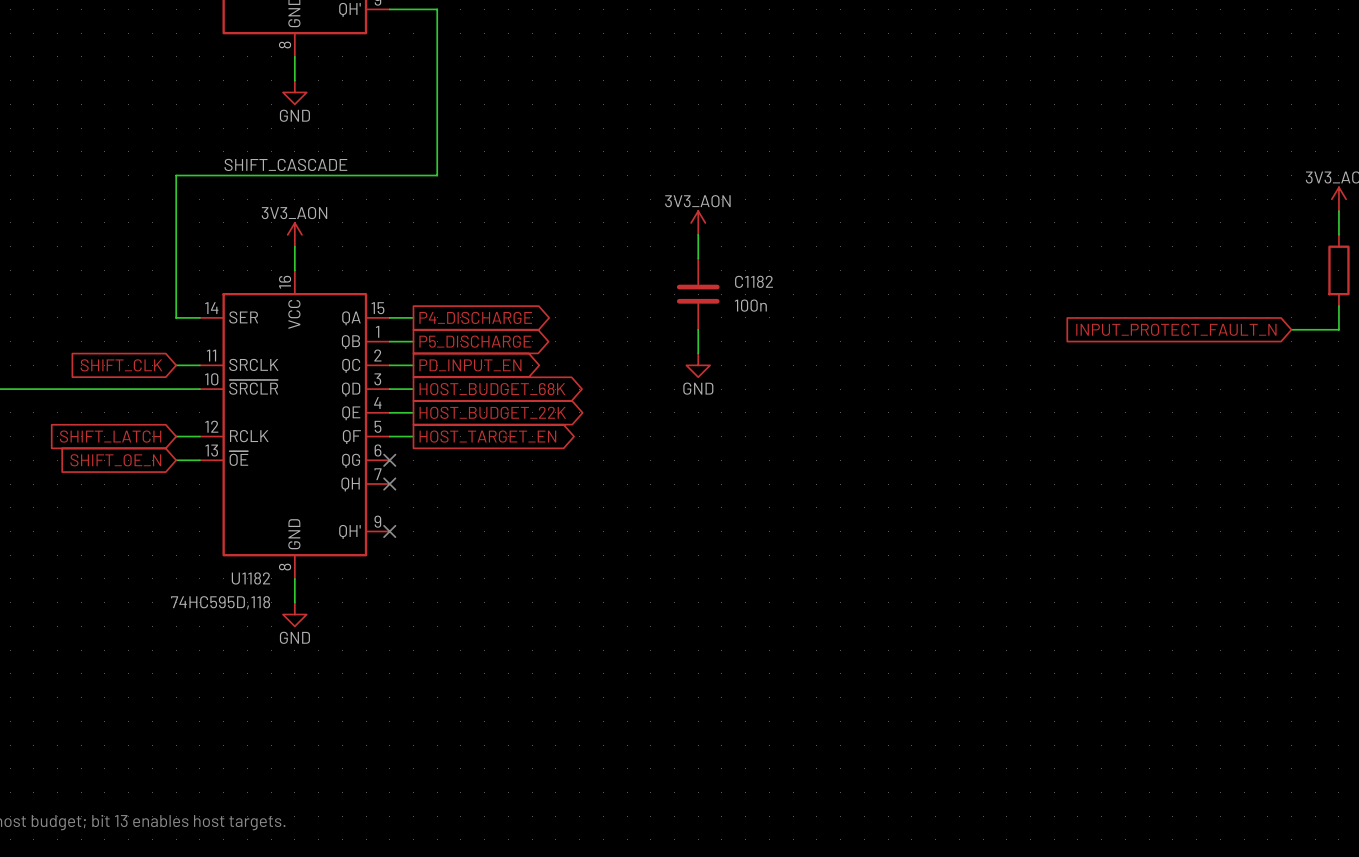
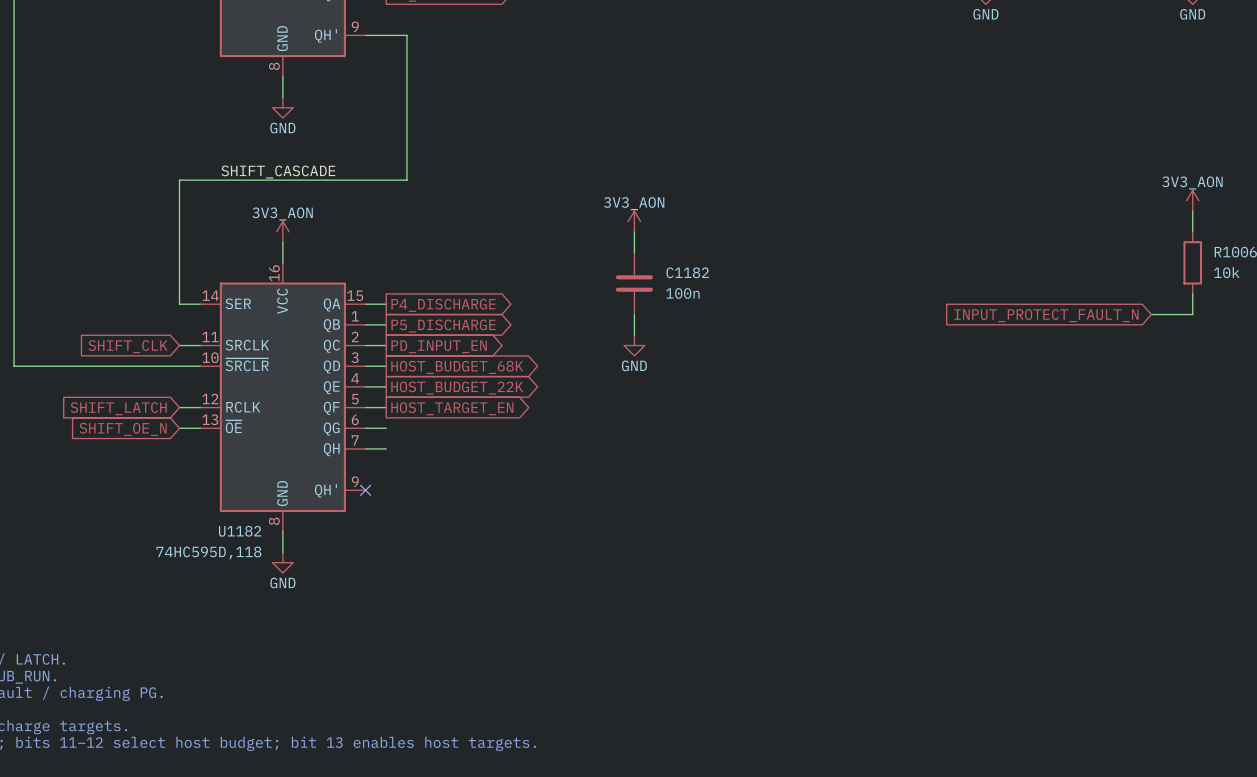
wire: none -> (365, 428) (386, 428)
no-connect mark: (389, 460) -> none
wire: none -> (365, 448) (386, 448)
no-connect mark: (389, 484) -> none

